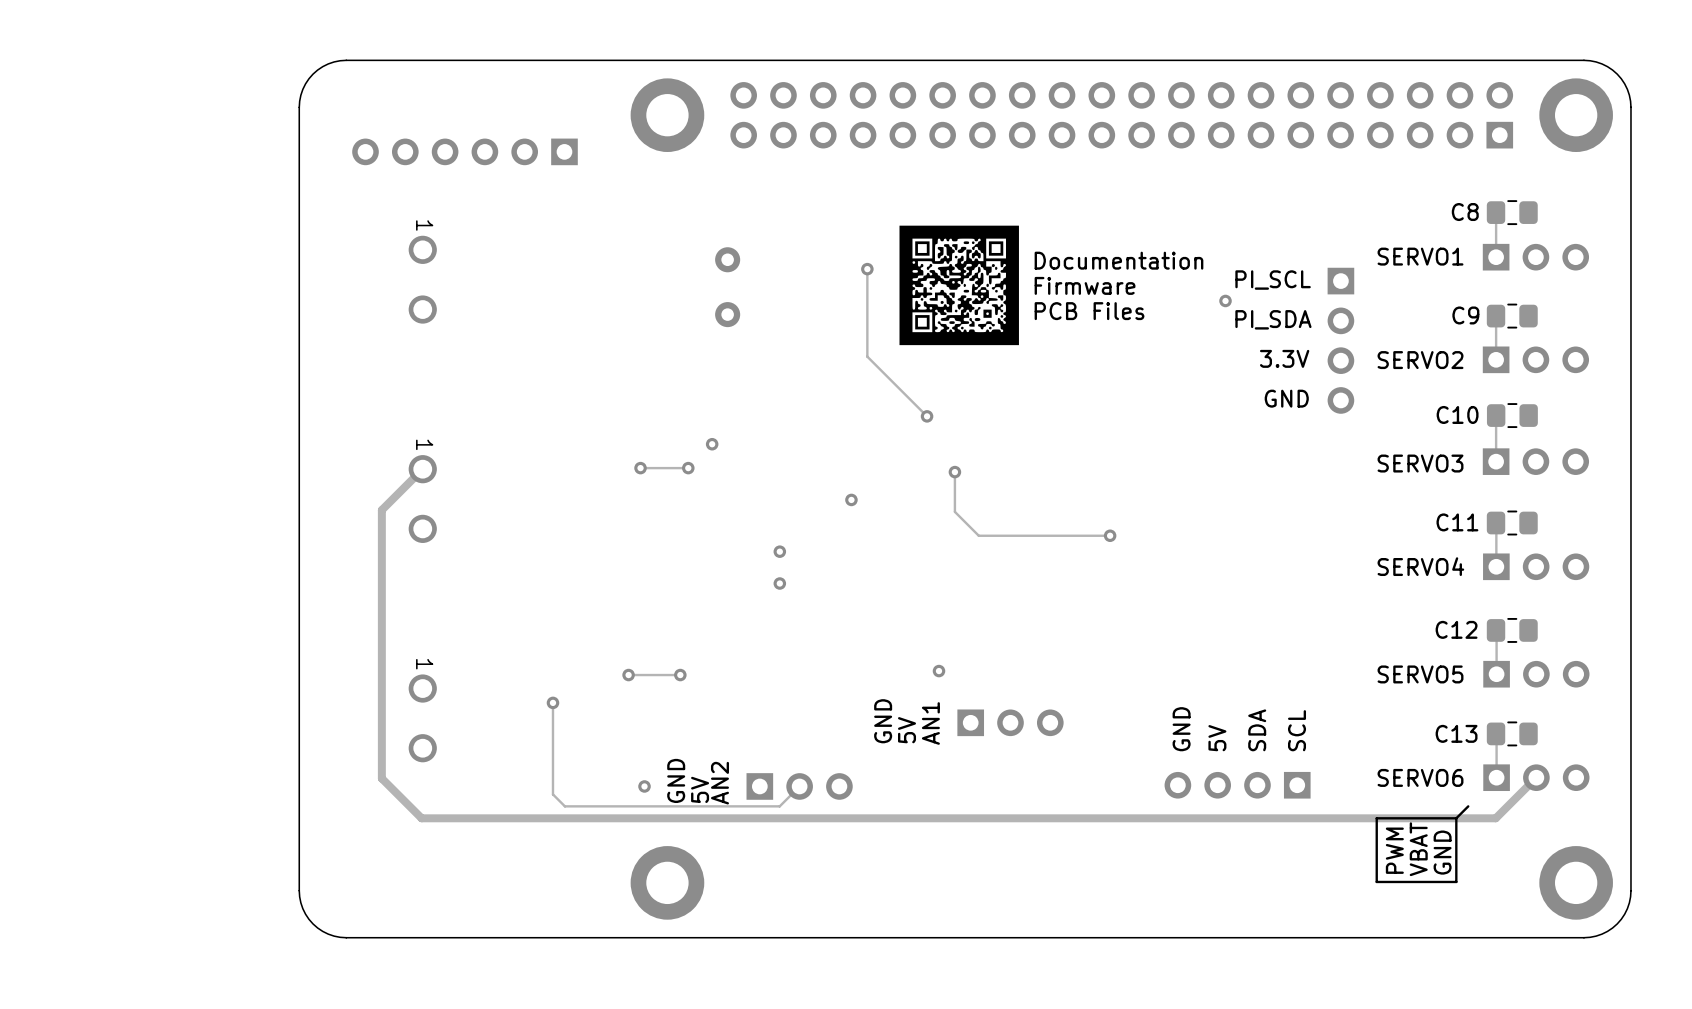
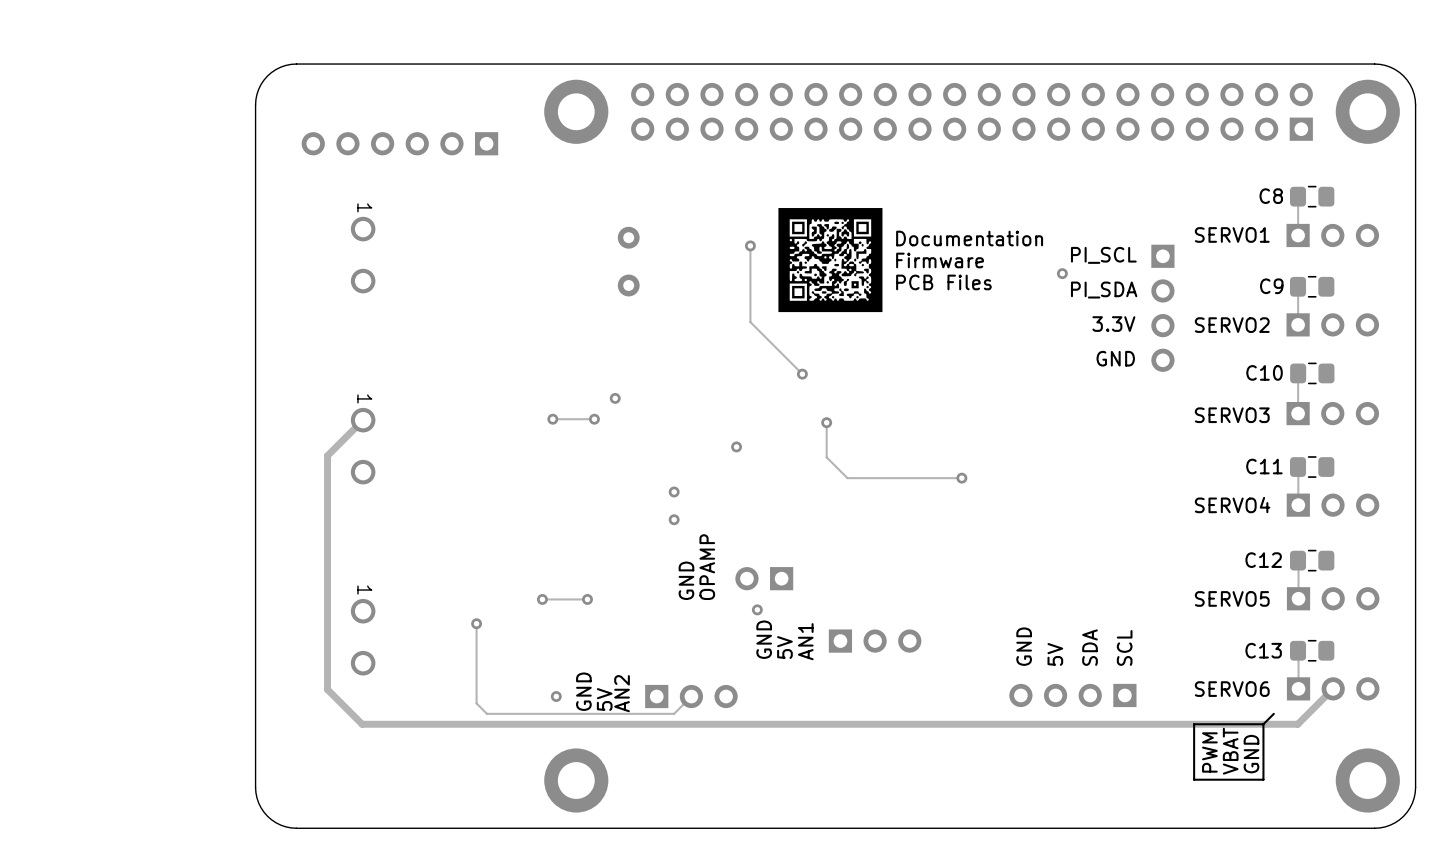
text: none -> OPAMP (707, 567)
part: none -> (764, 578)
text: none -> GND (686, 580)
via position: (938, 671) -> (757, 609)

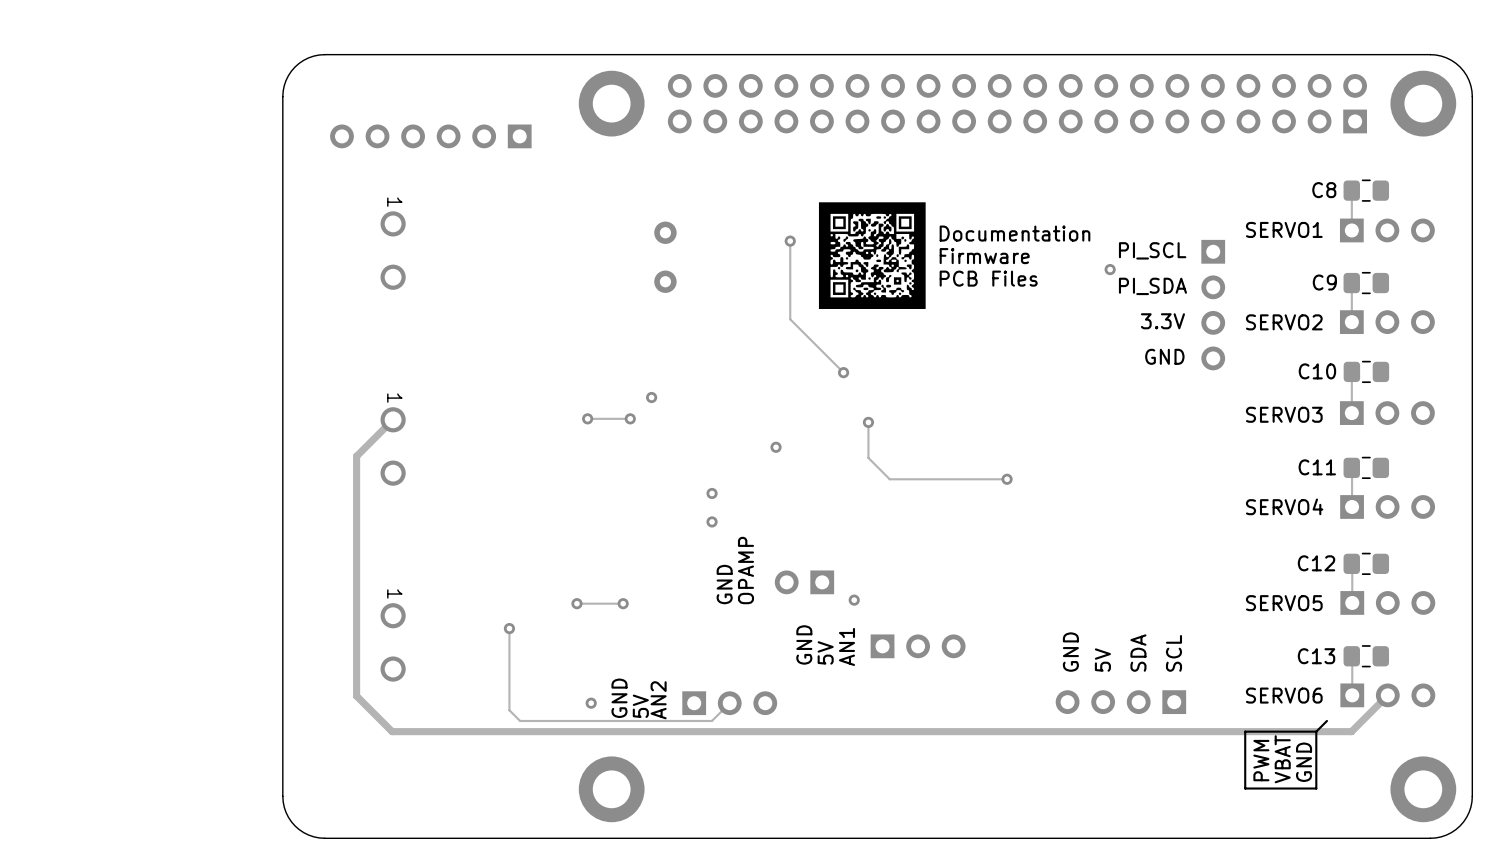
via position: (757, 609) -> (854, 600)

